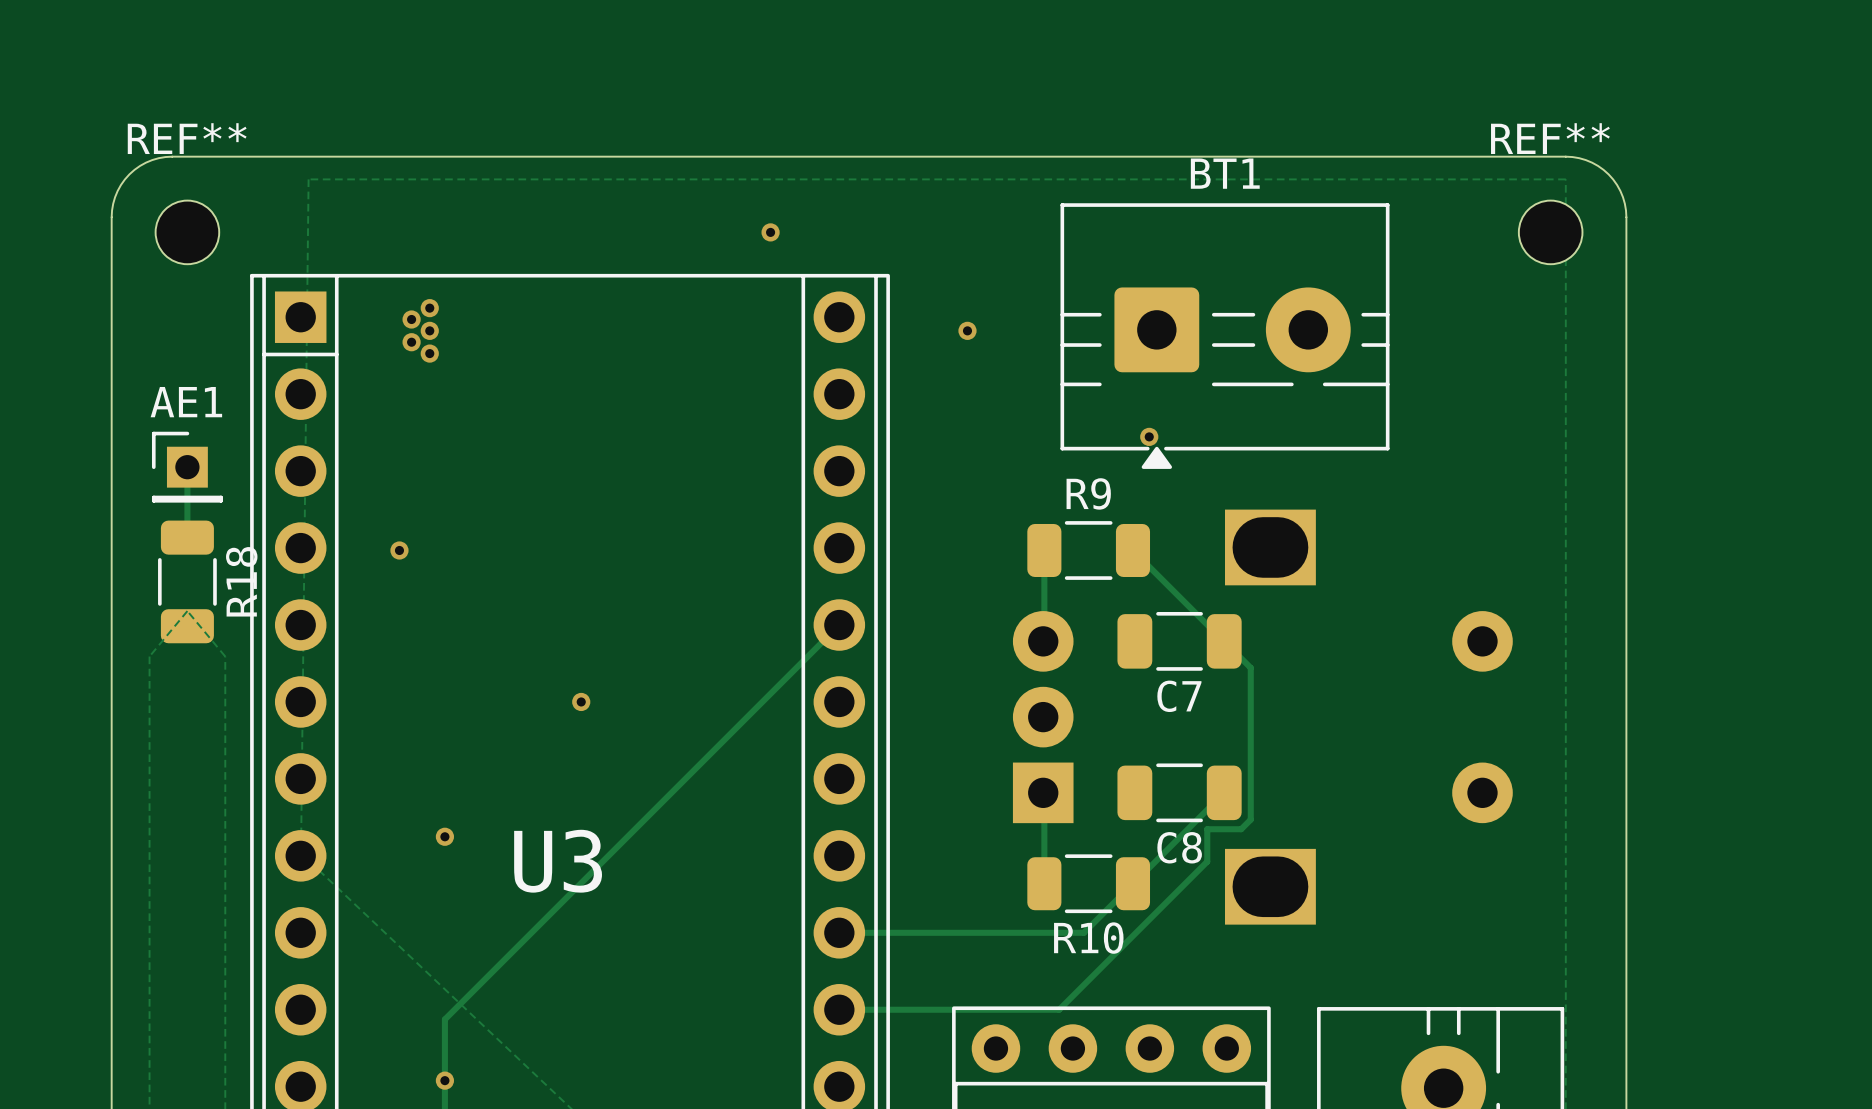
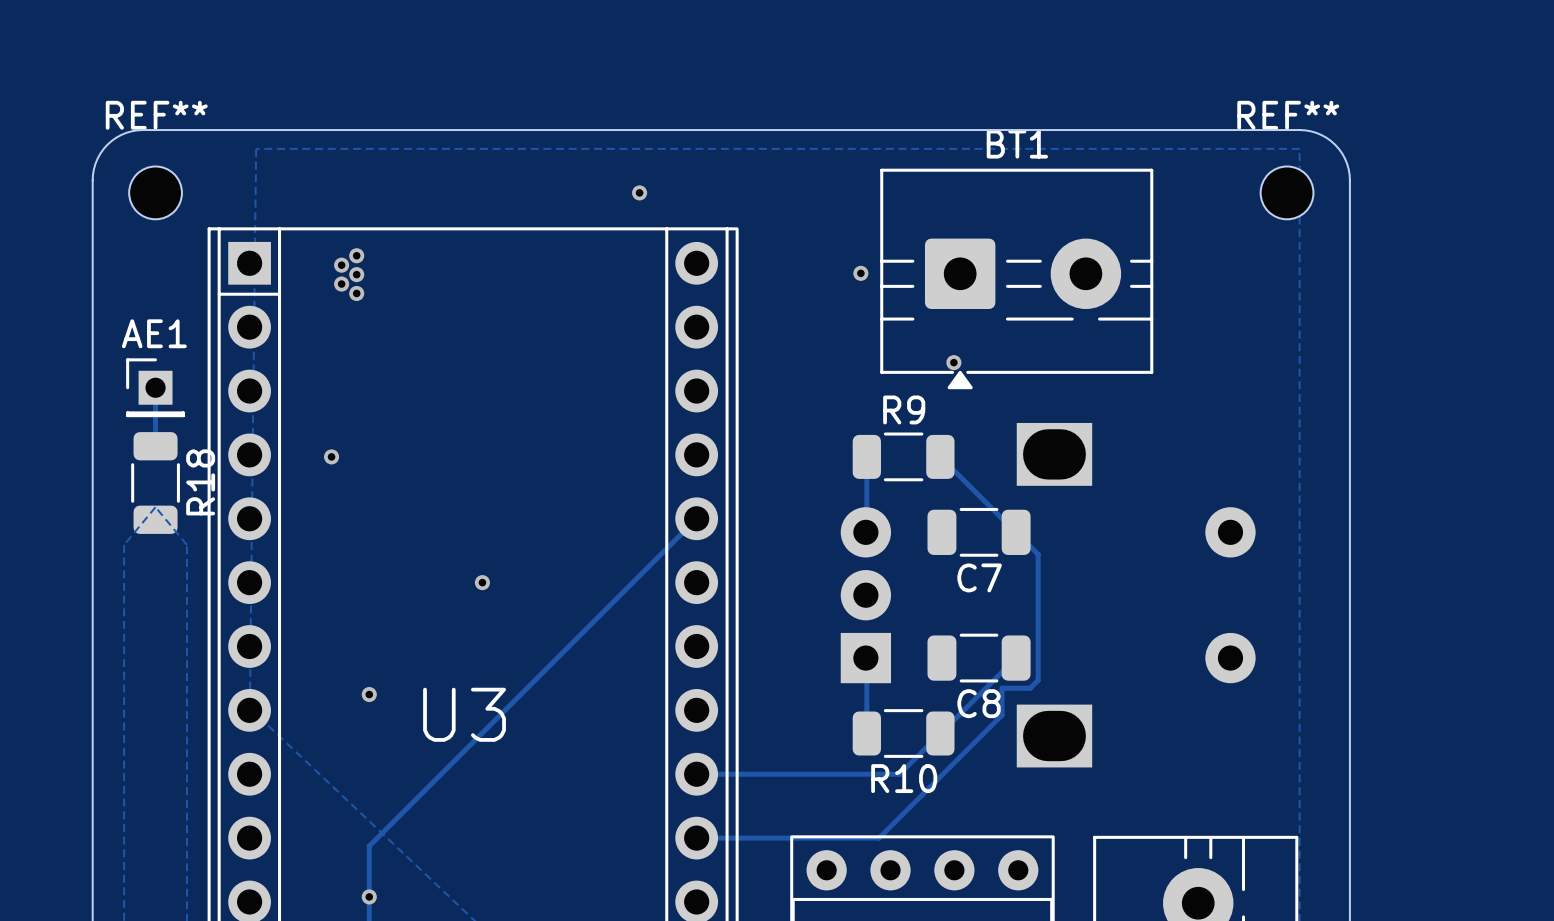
via position: (967, 330) -> (860, 273)

